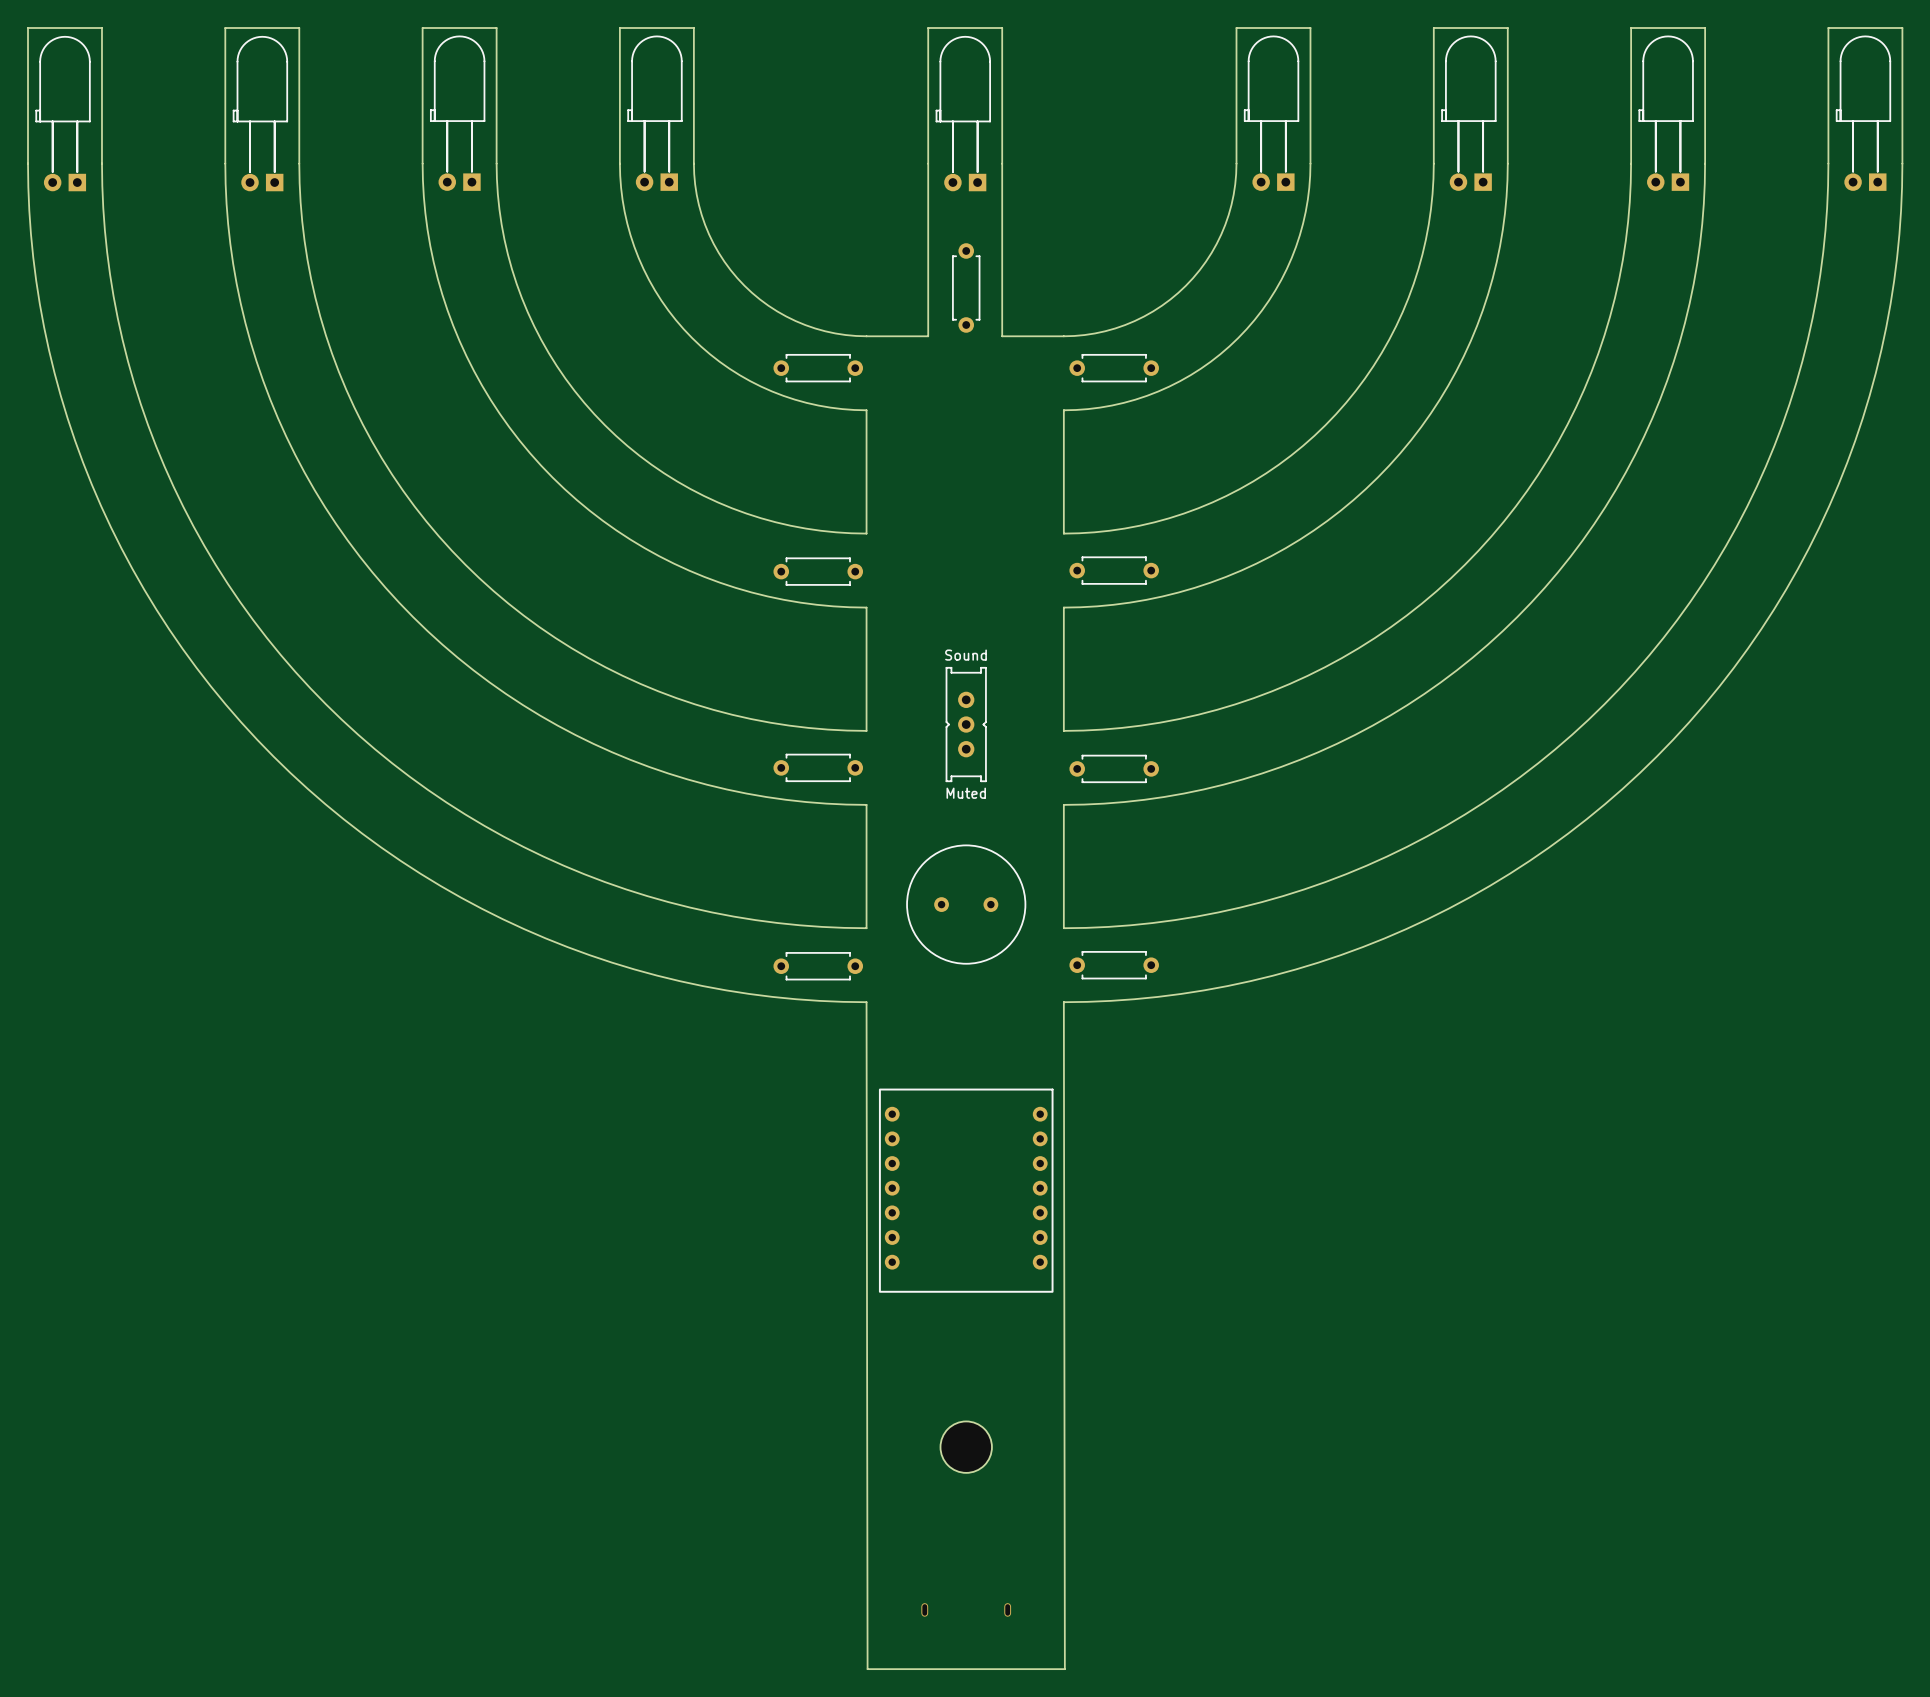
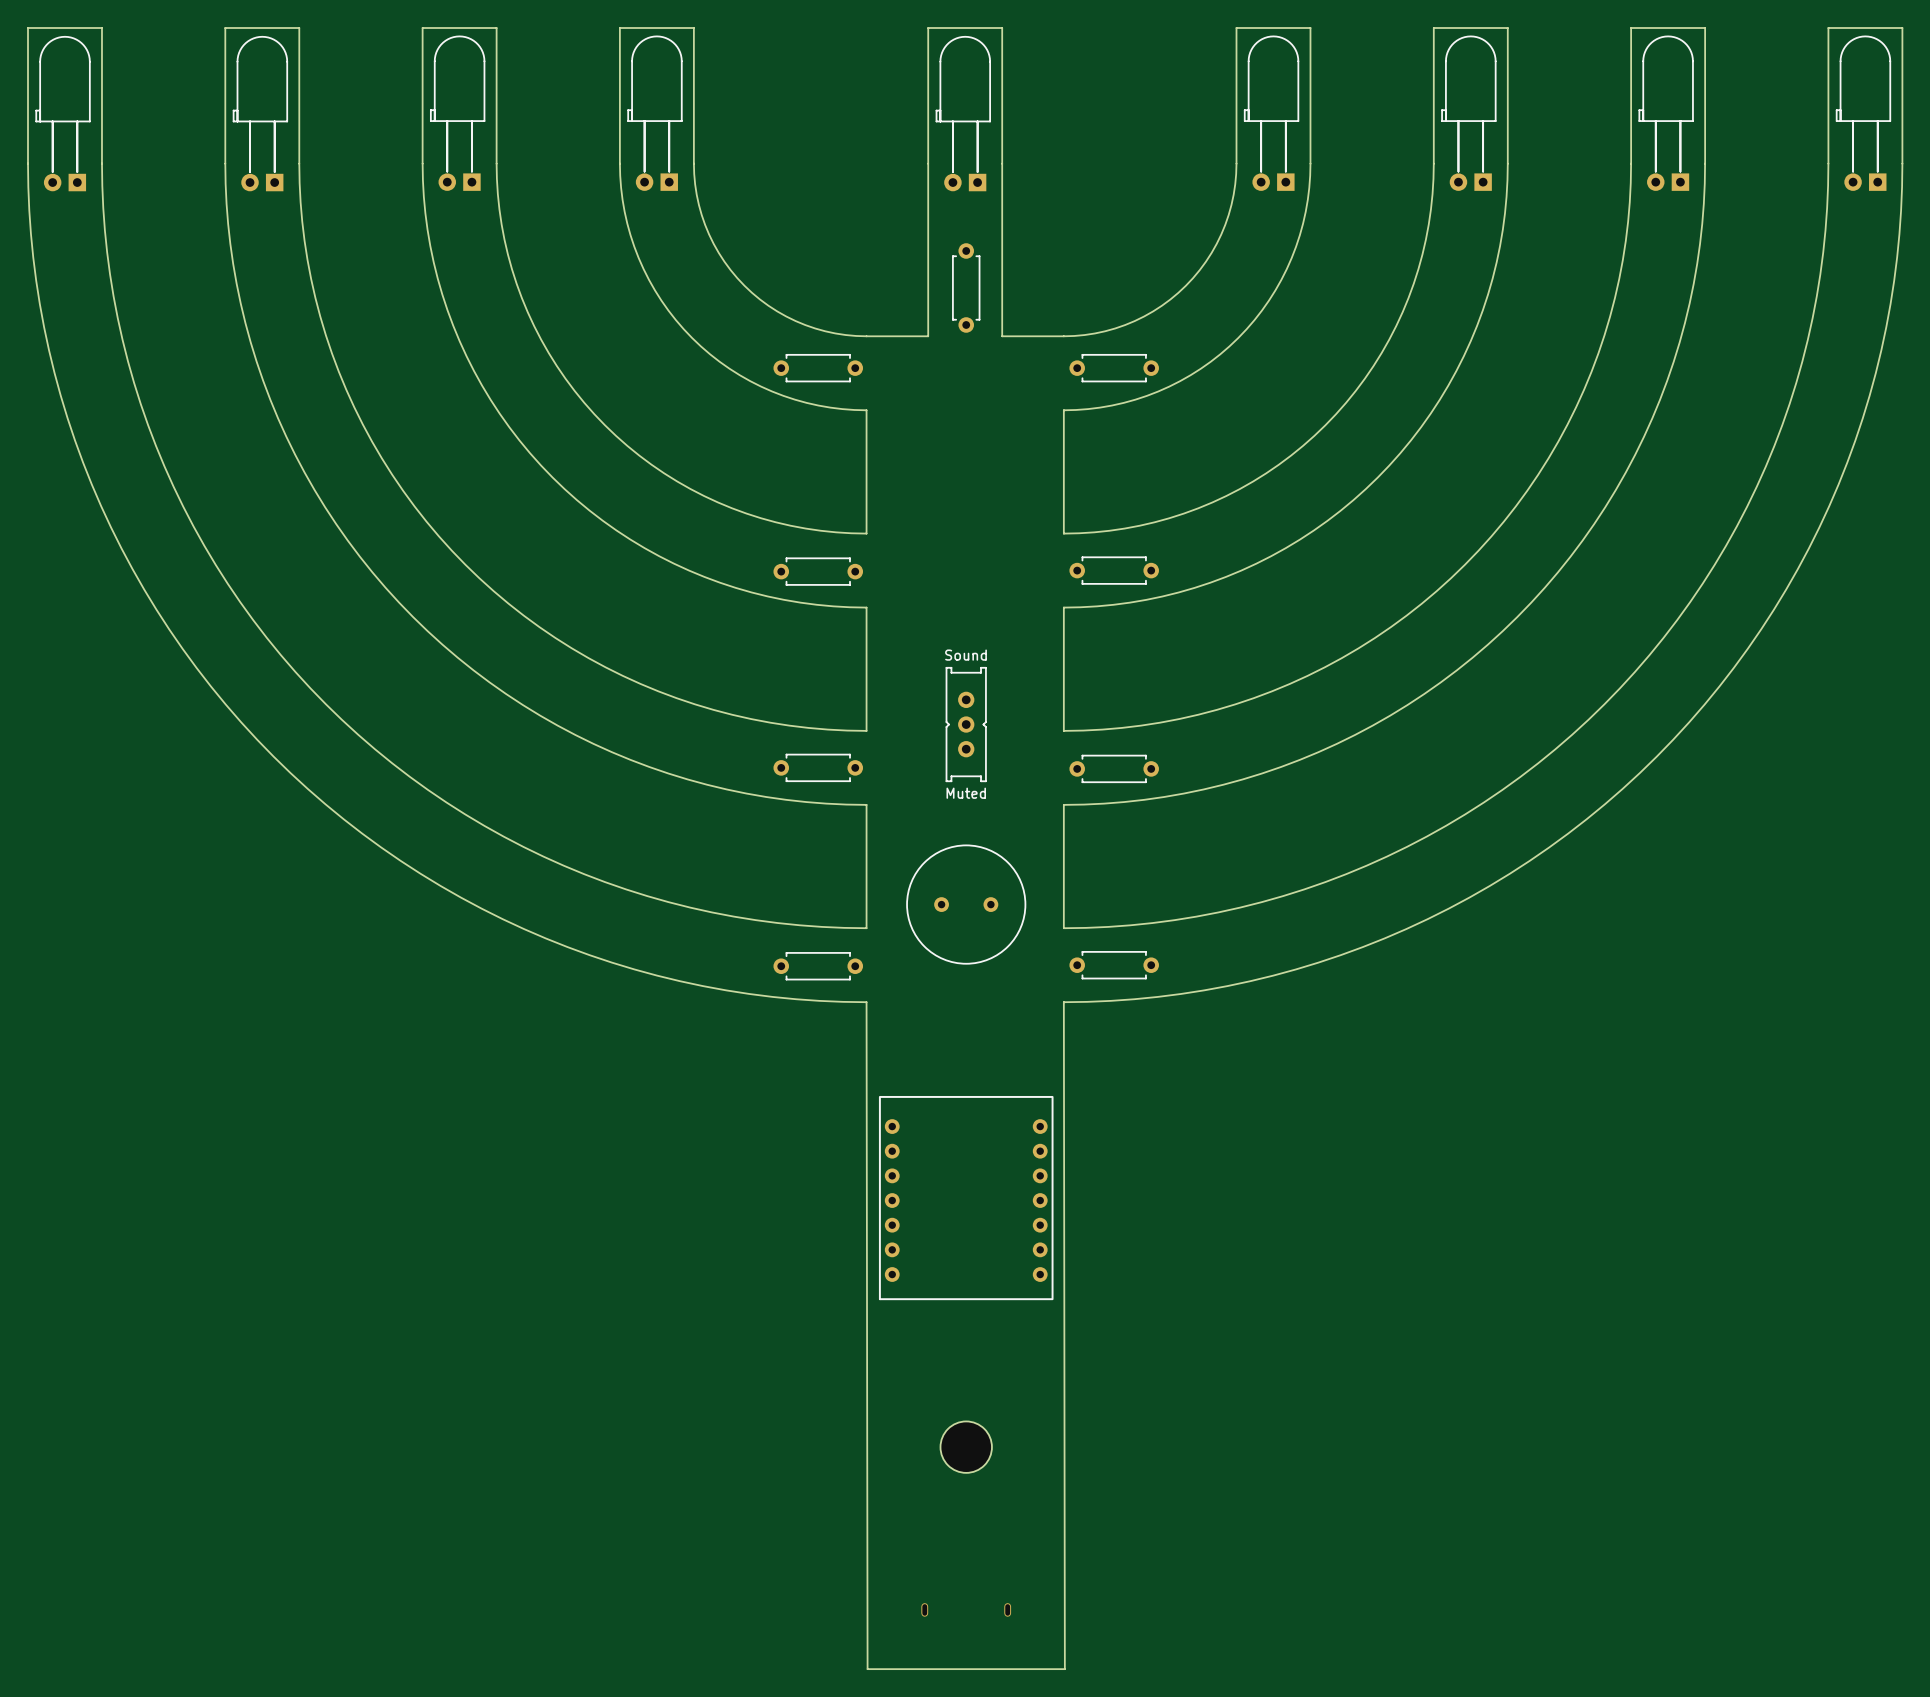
part rotation: 0° (966, 1190) -> 180° (966, 1198)

